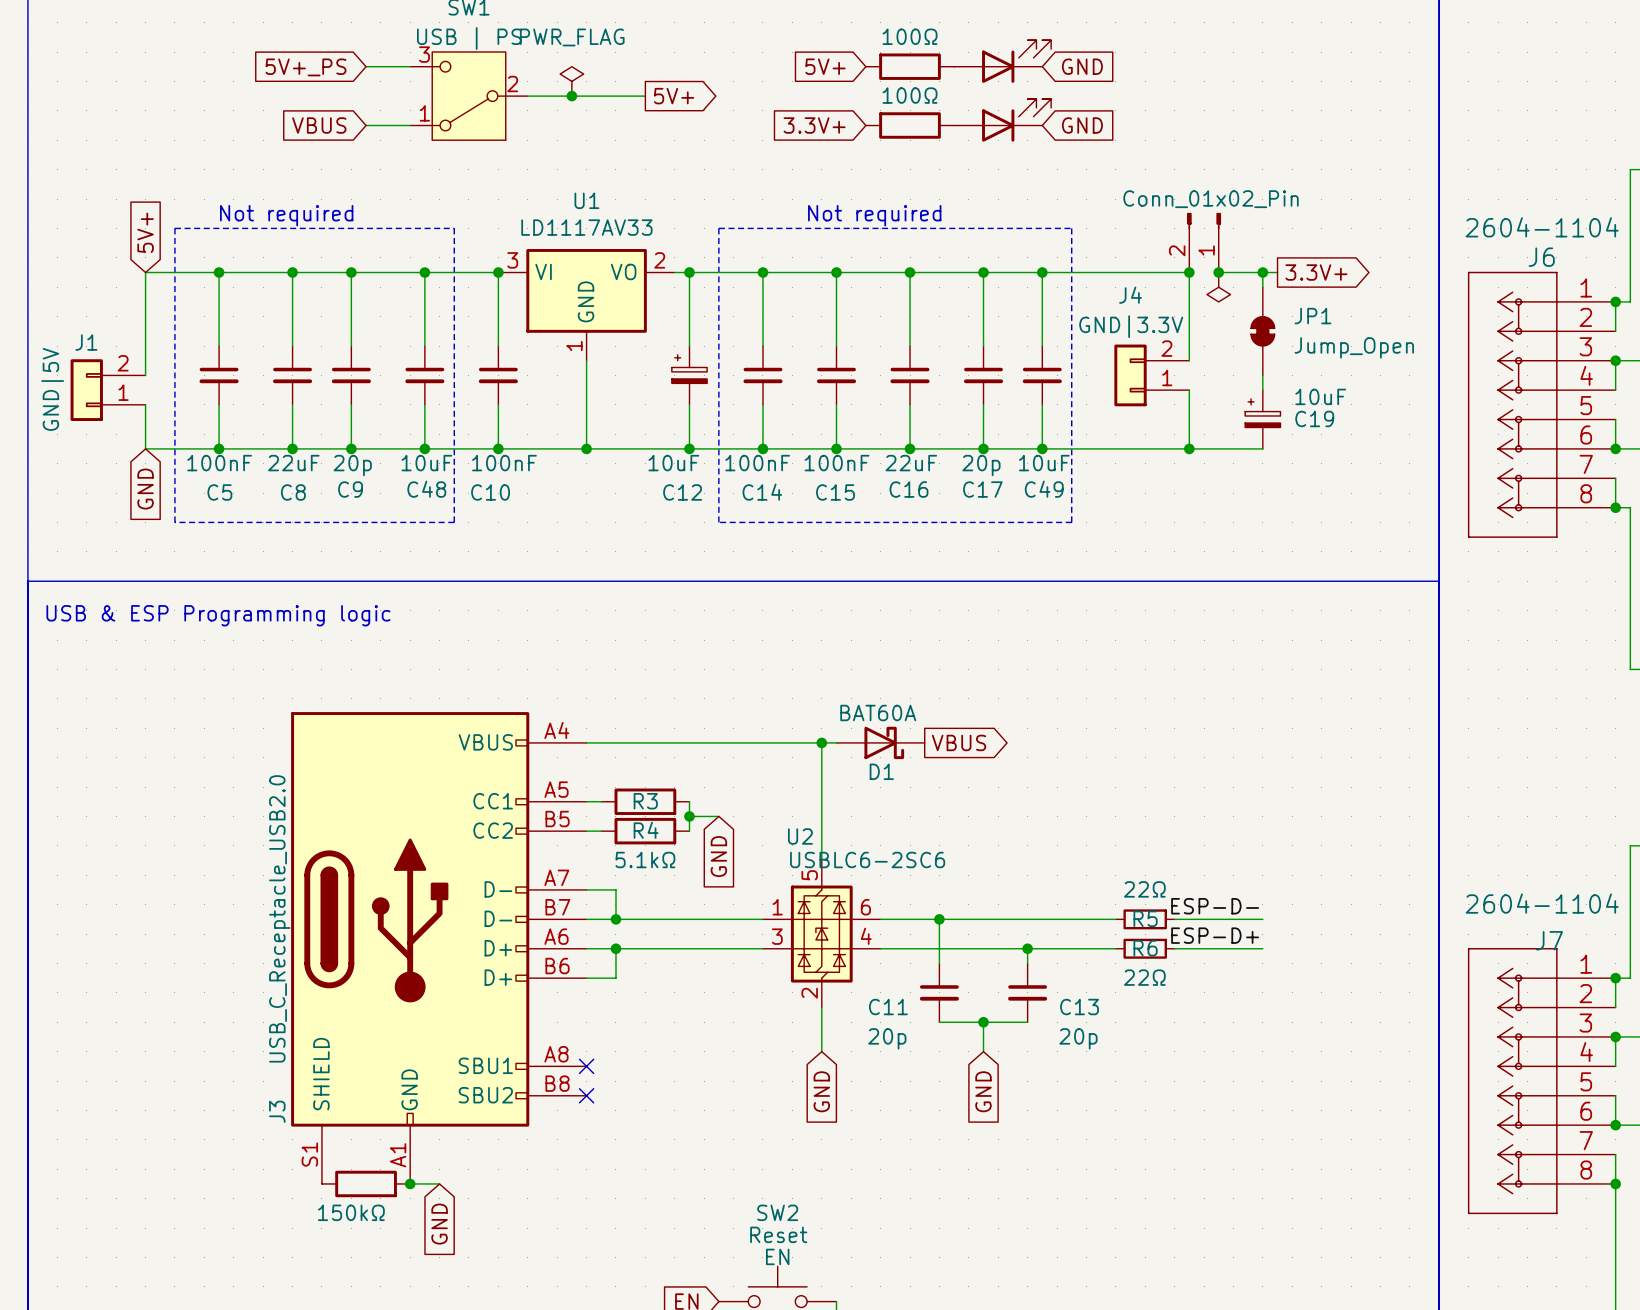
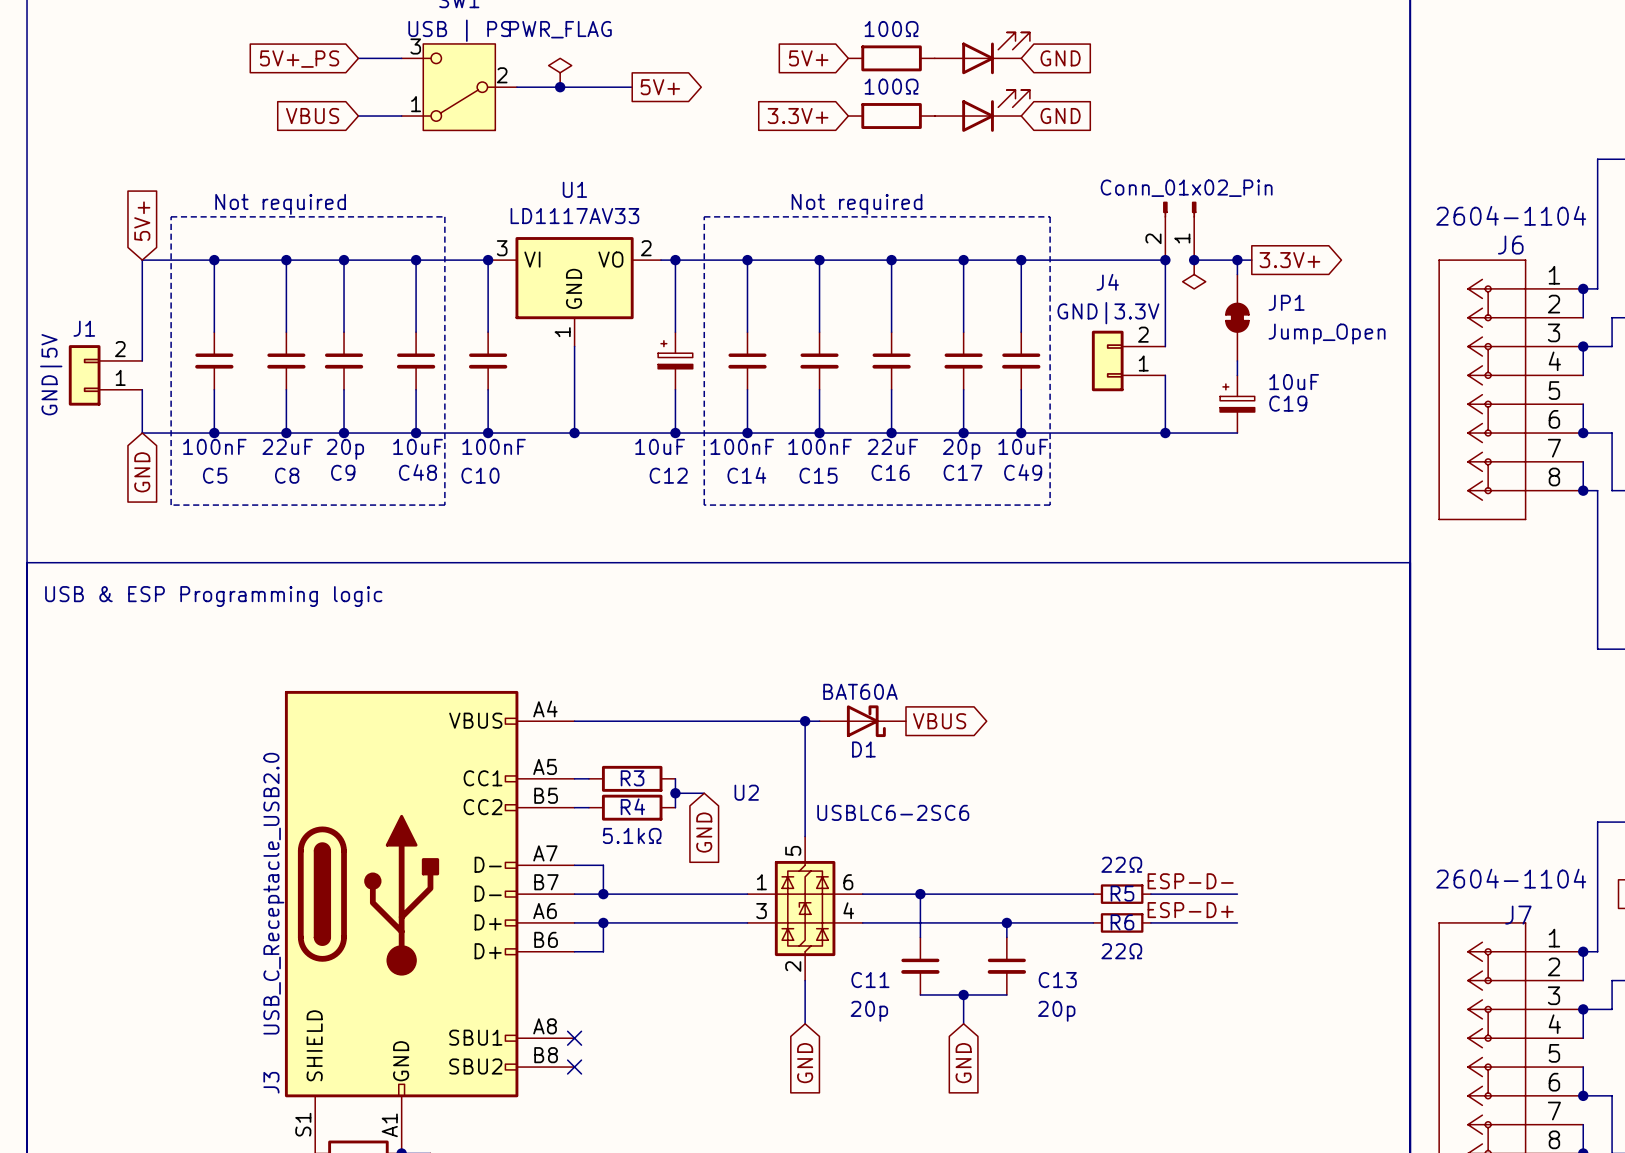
U2 name position: U2 (800, 836) -> U2 (746, 792)
U2 value position: USBLC6-2SC6 (867, 860) -> USBLC6-2SC6 (893, 812)

